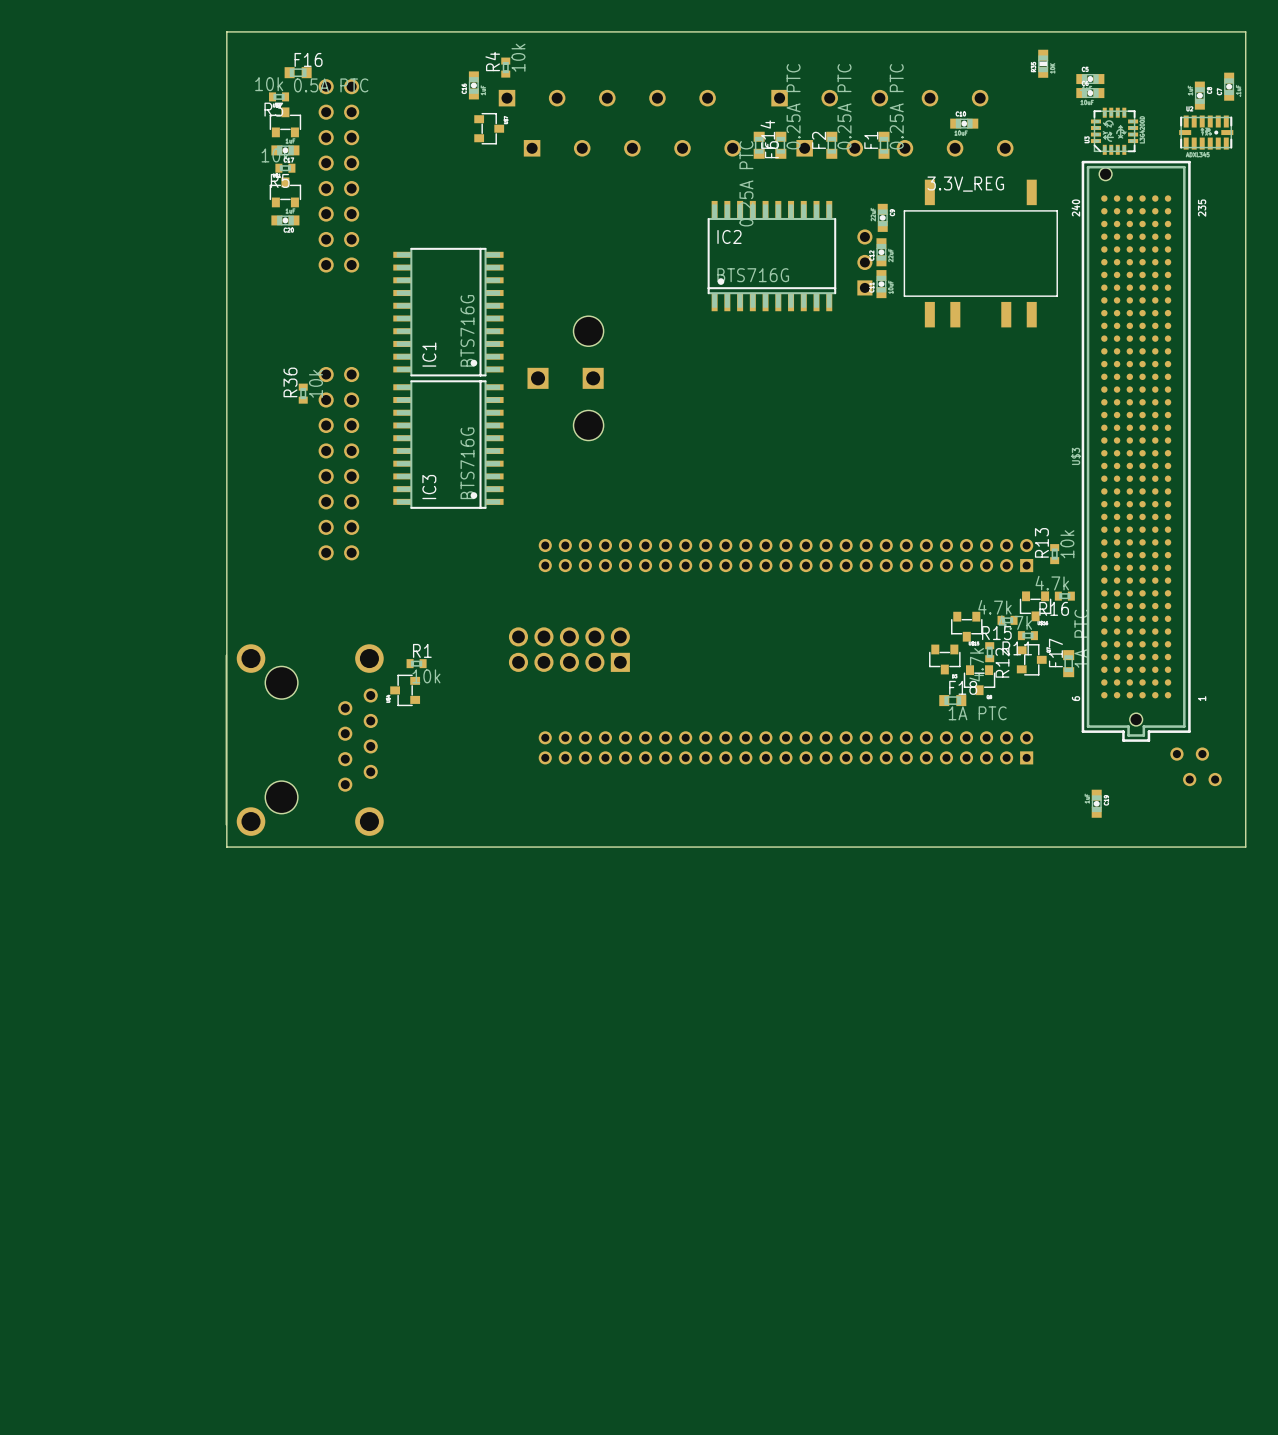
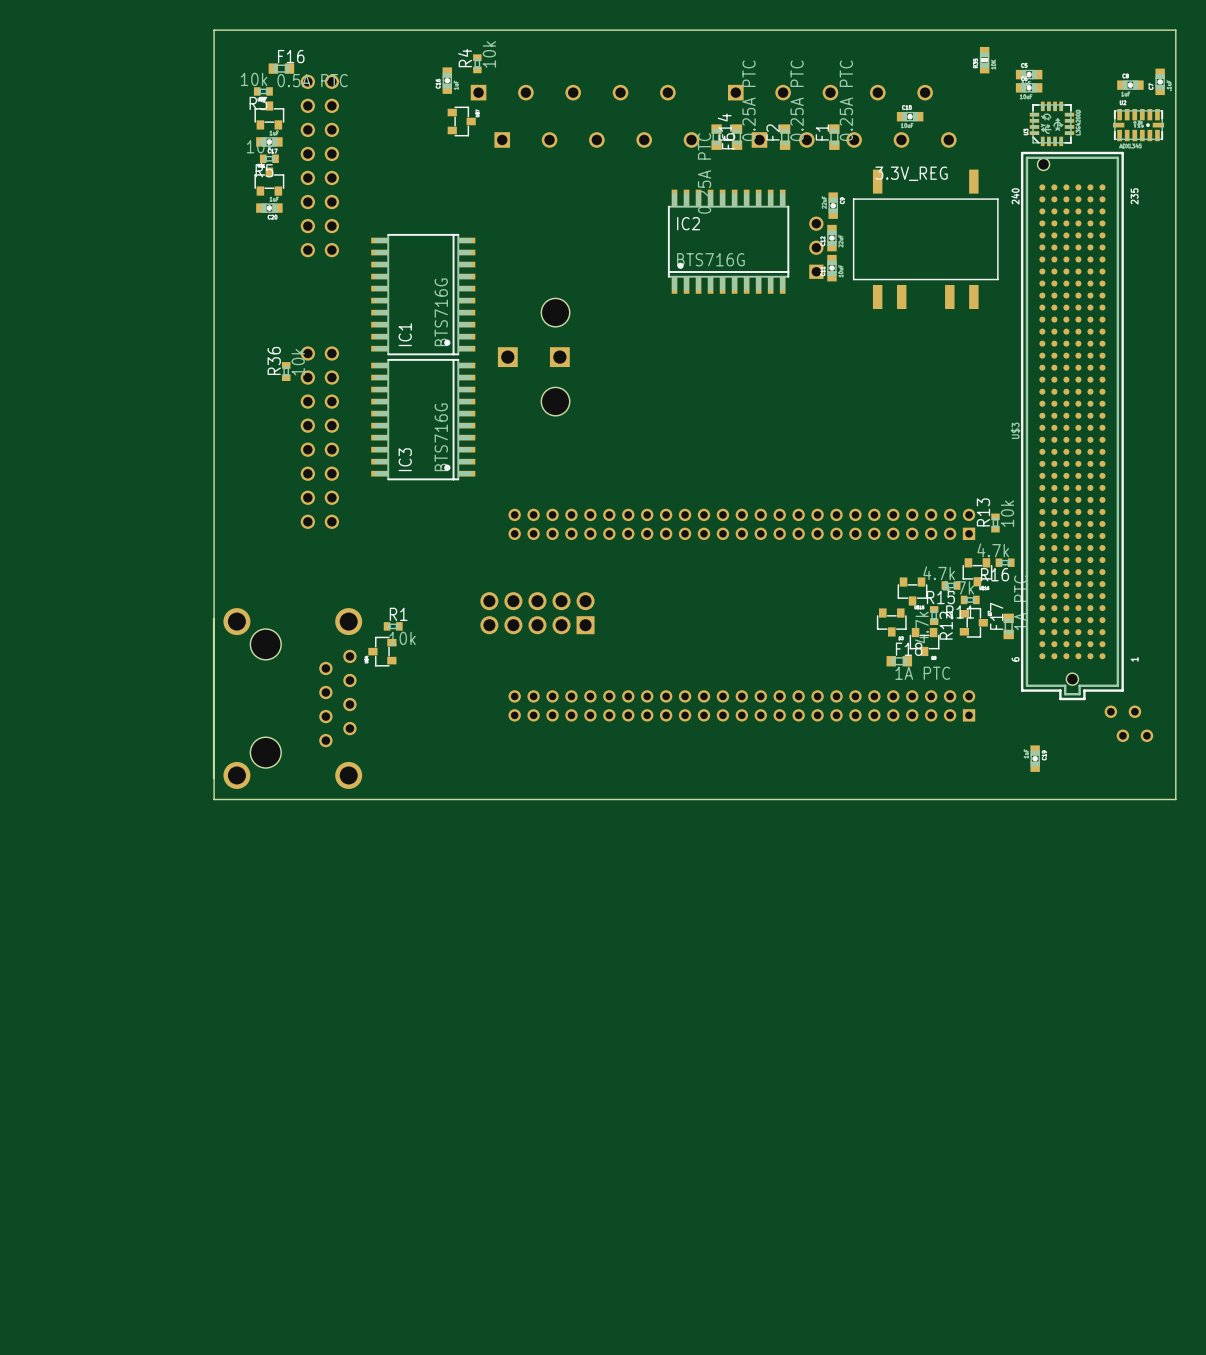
part rotation: 0° (1199, 95) -> 90° clockwise (1130, 85)

